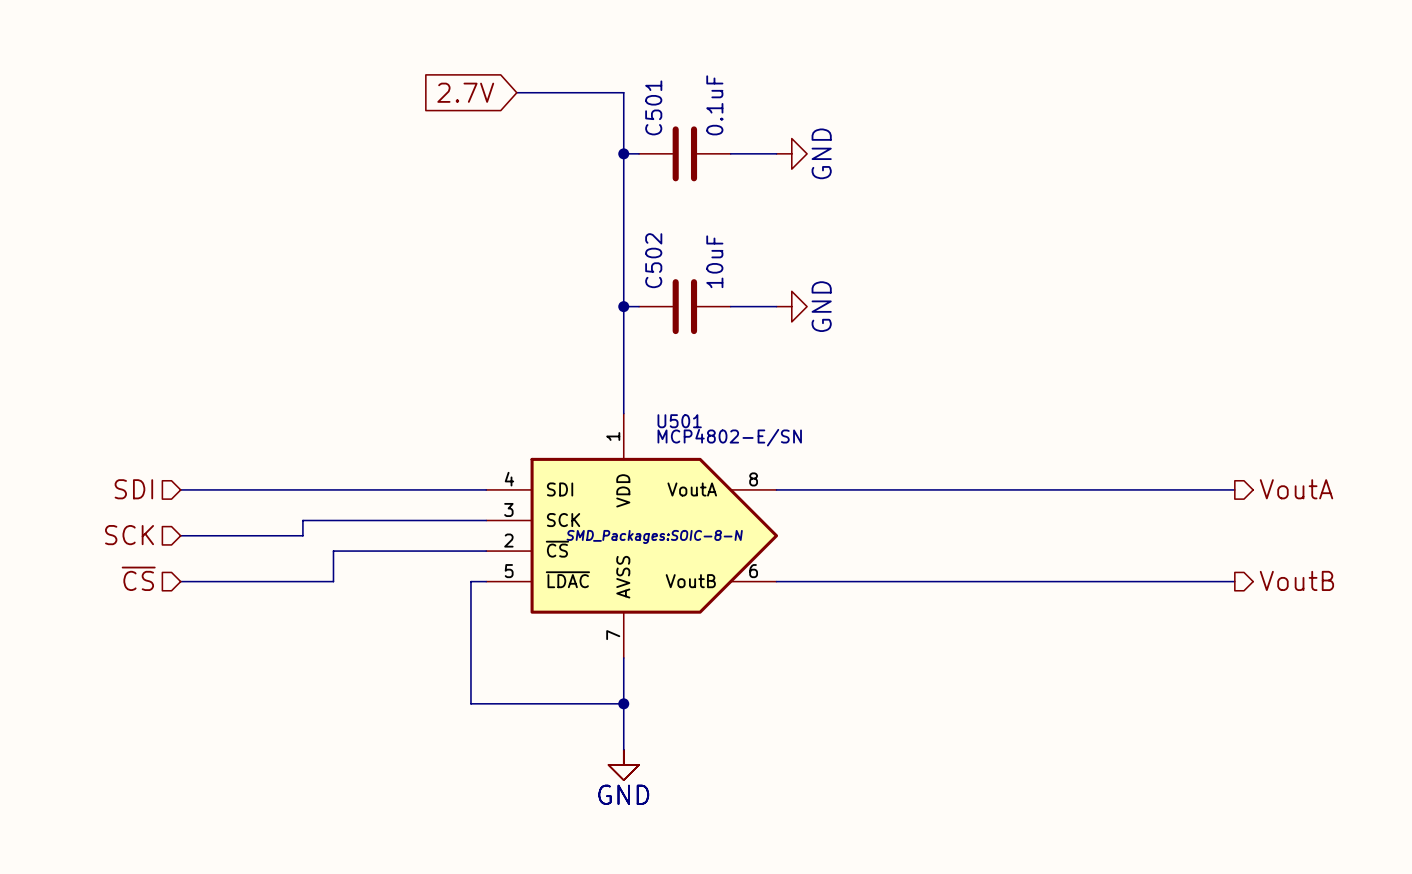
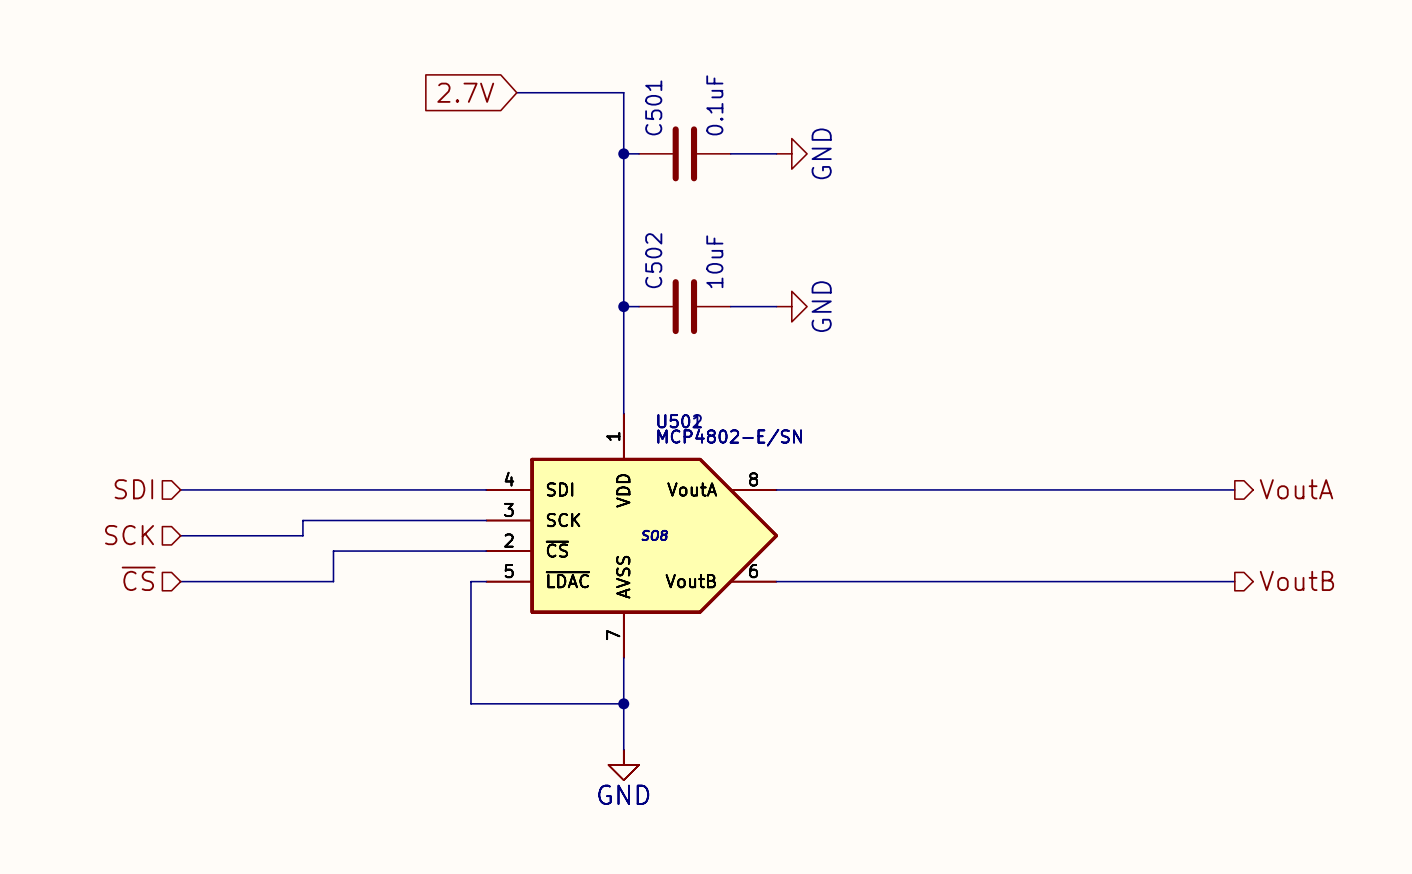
part: none -> MCP4802-E/SN (632, 535)
U501 text: SMD_Packages:SOIC-8-N (654, 536) -> SO8 (654, 535)

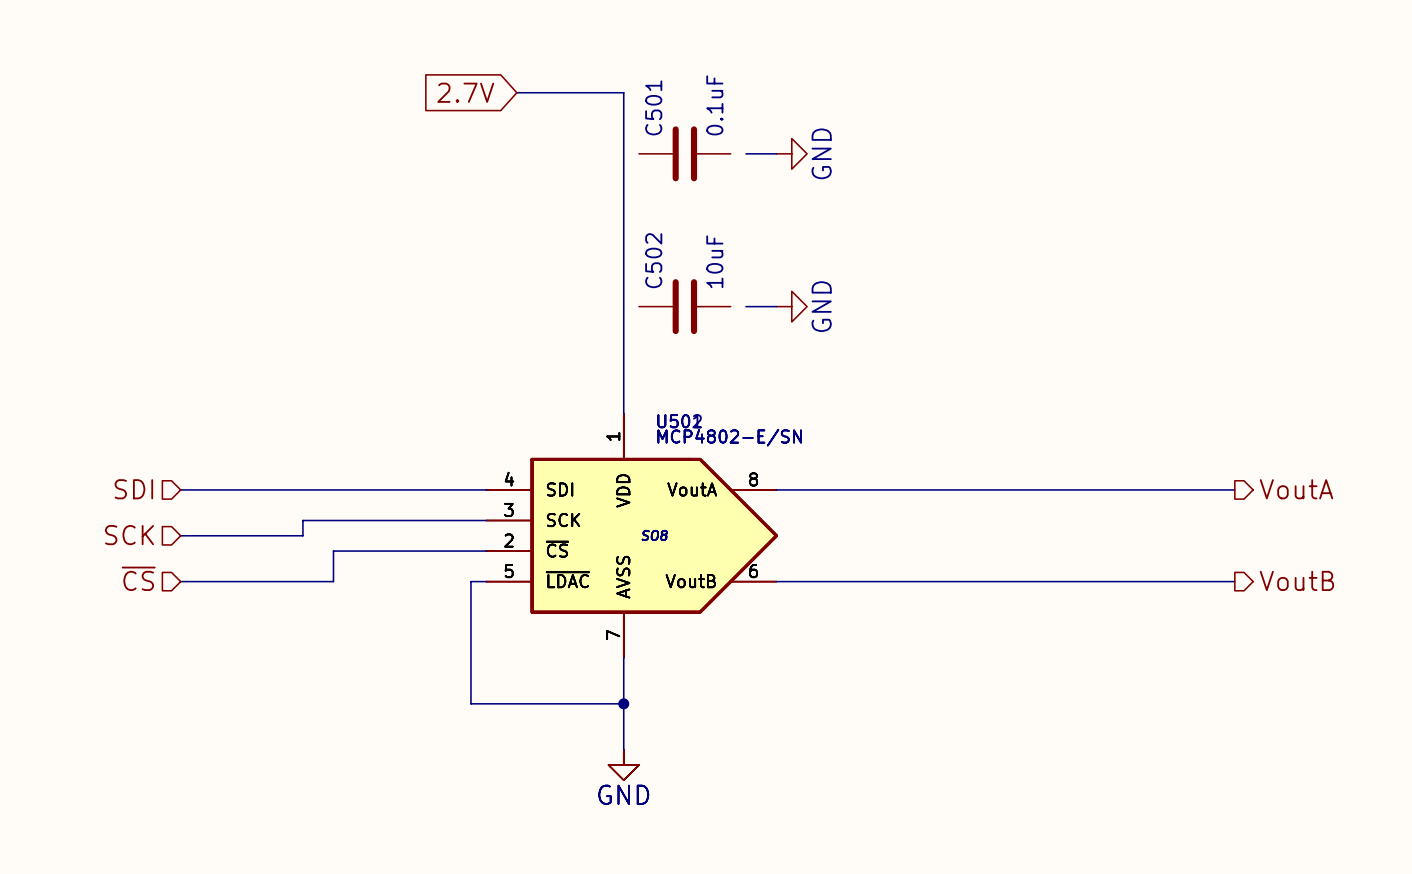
wire: (623, 153) (639, 153) -> none
junction: (623, 153) -> none
wire: (730, 153) (745, 153) -> none
wire: (623, 306) (639, 306) -> none
junction: (623, 306) -> none
wire: (730, 306) (745, 306) -> none

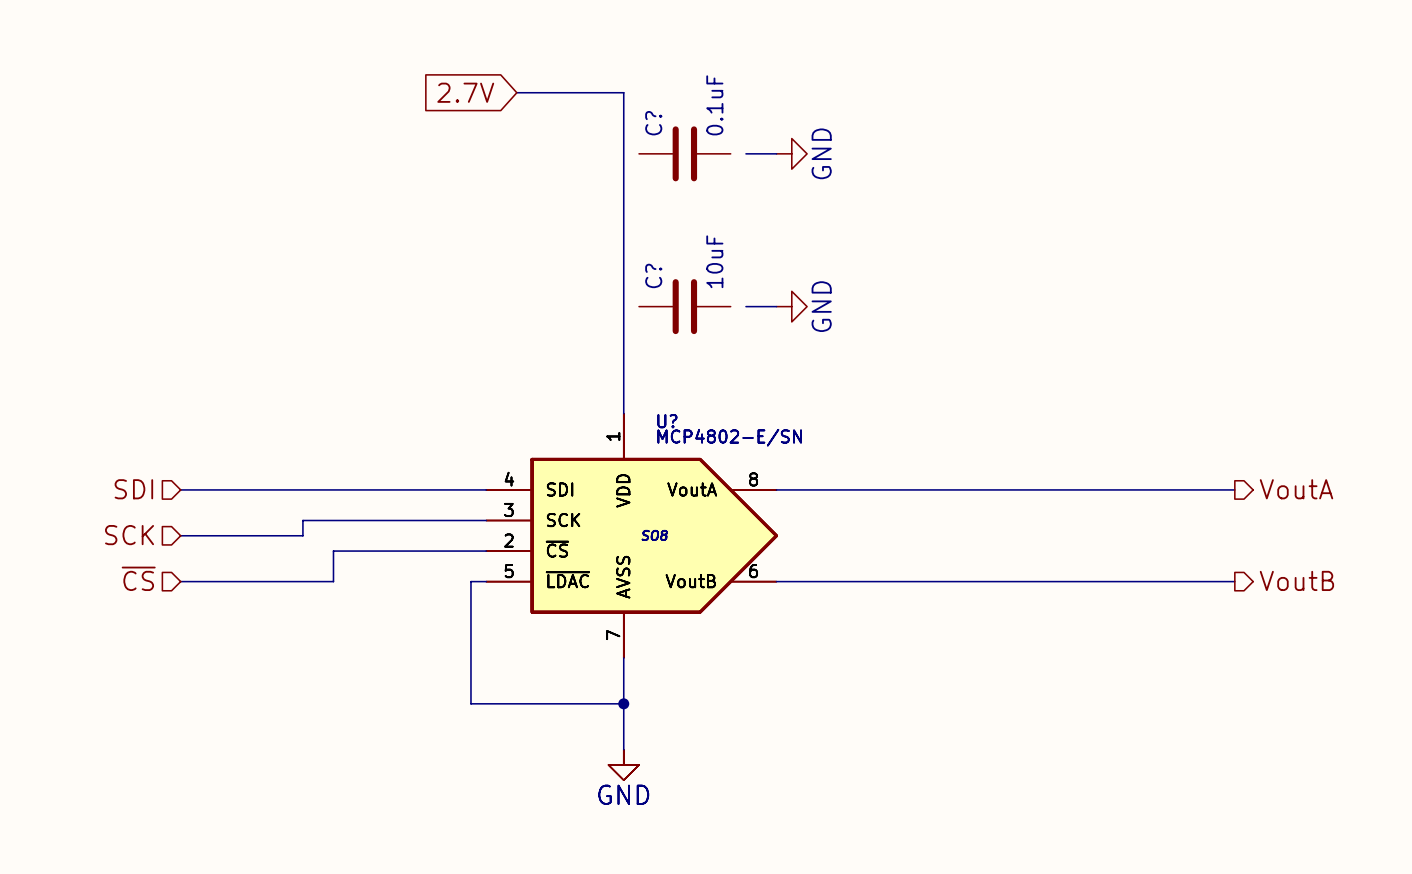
C501 name: C501 (653, 107) -> C? (653, 123)
C502 name: C502 (653, 260) -> C? (653, 275)
part: MCP4802-E/SN (632, 535) -> none
part: MCP4802-E/SN (632, 535) -> none
U?: none -> MCP4802-E/SN (632, 535)

